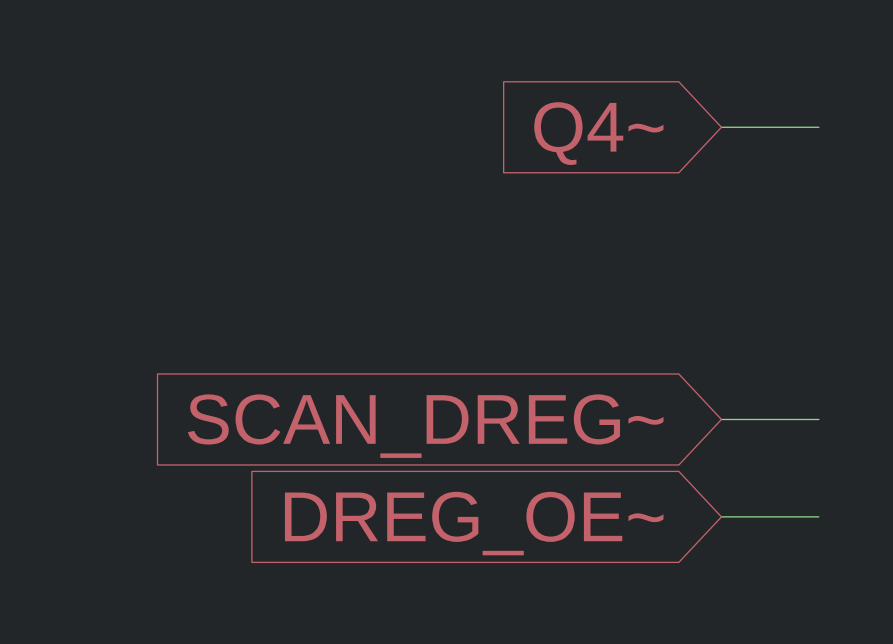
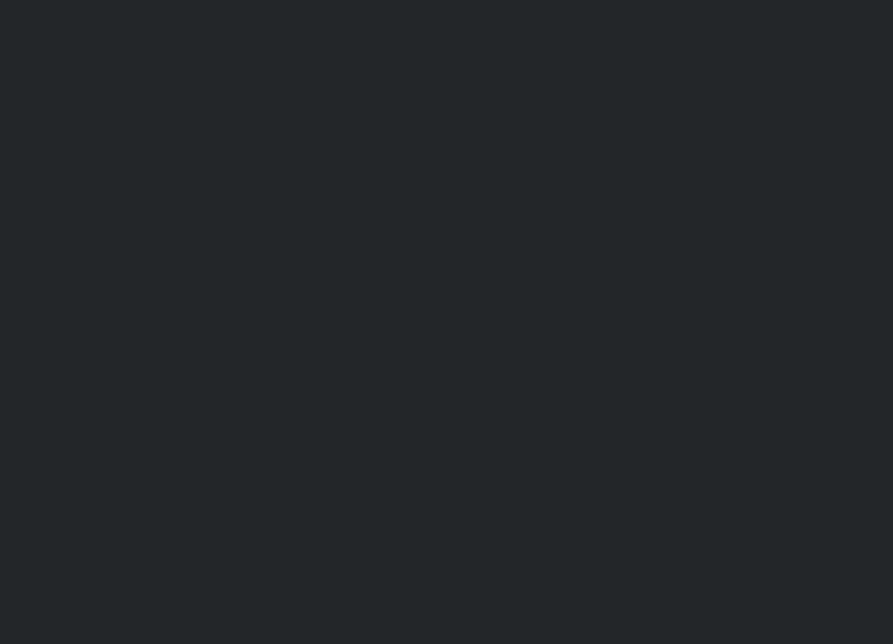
wire: (721, 127) (818, 127) -> none
global label: Q4~ (598, 133) -> none
wire: (721, 419) (818, 419) -> none
global label: SCAN_DREG~ (425, 426) -> none
wire: (721, 516) (818, 516) -> none
global label: DREG_OE~ (474, 523) -> none

